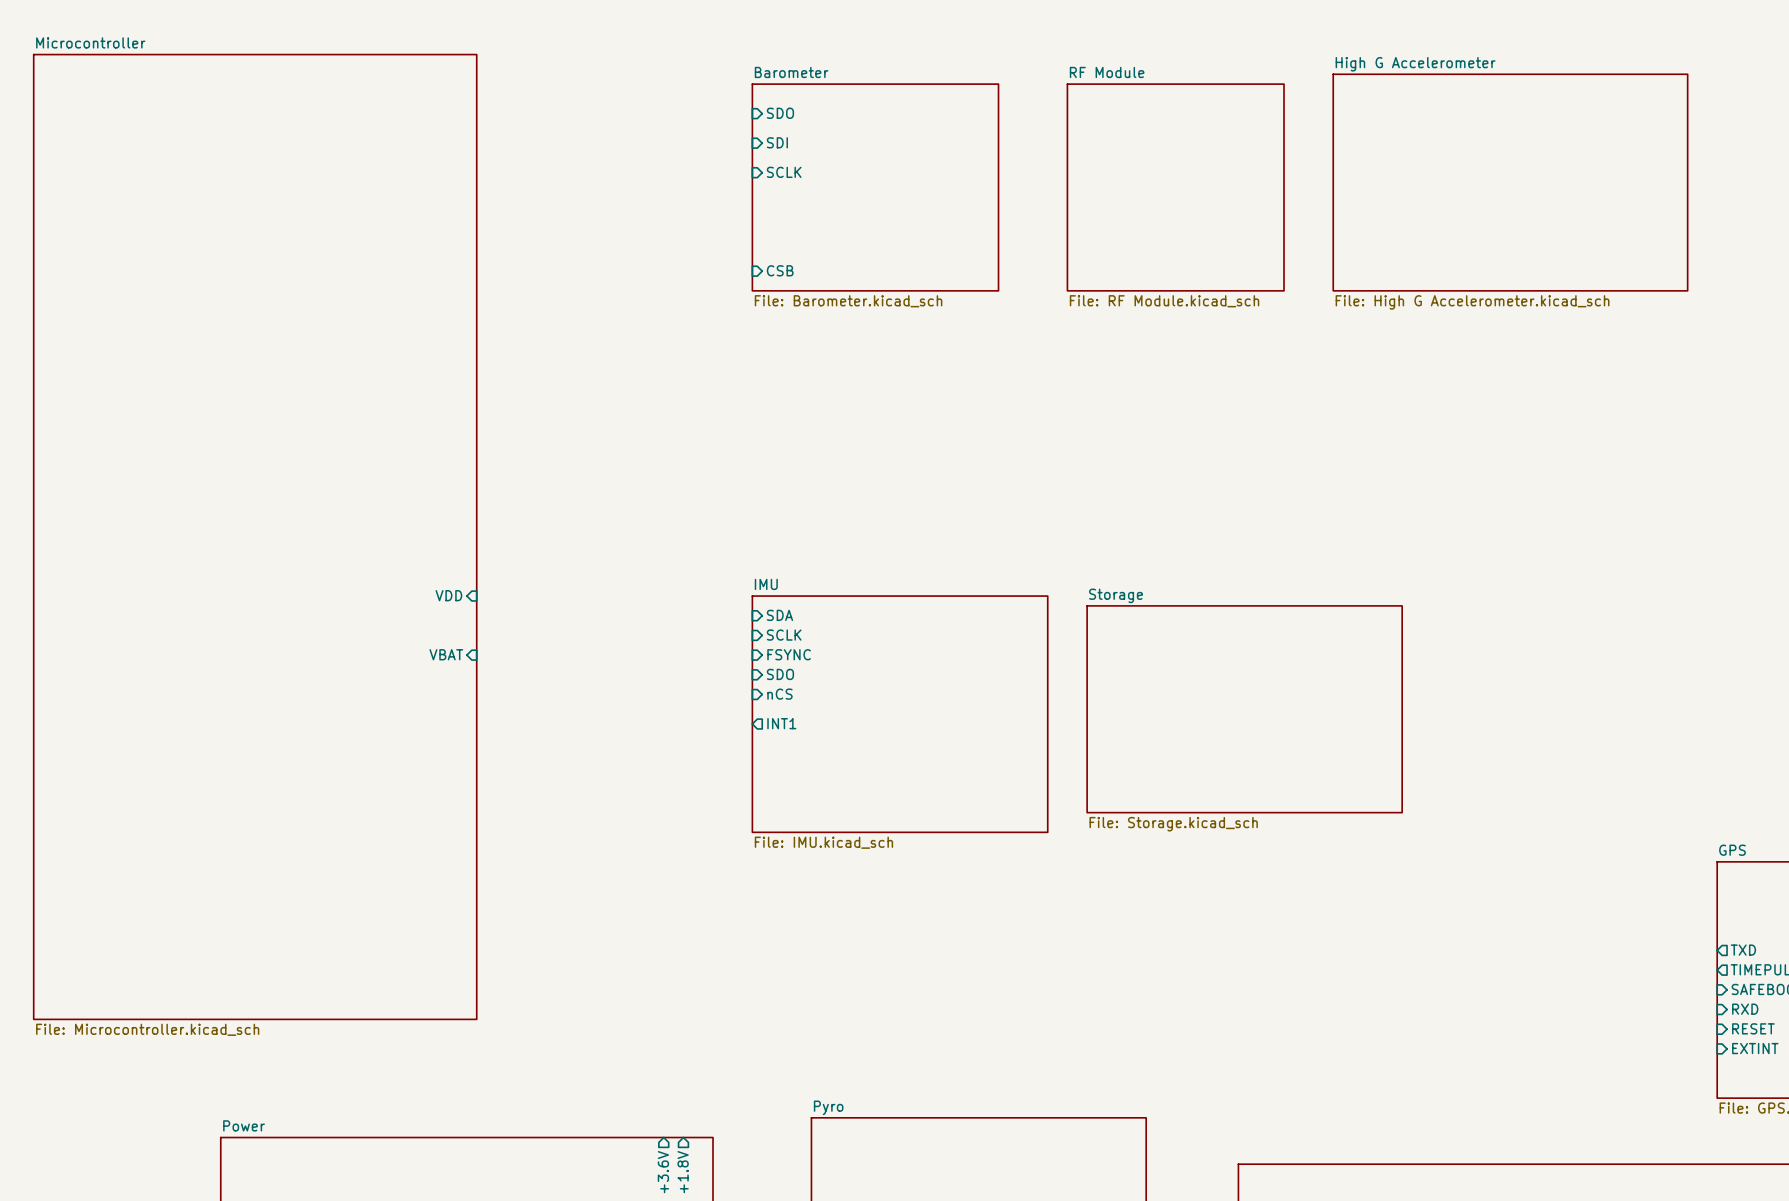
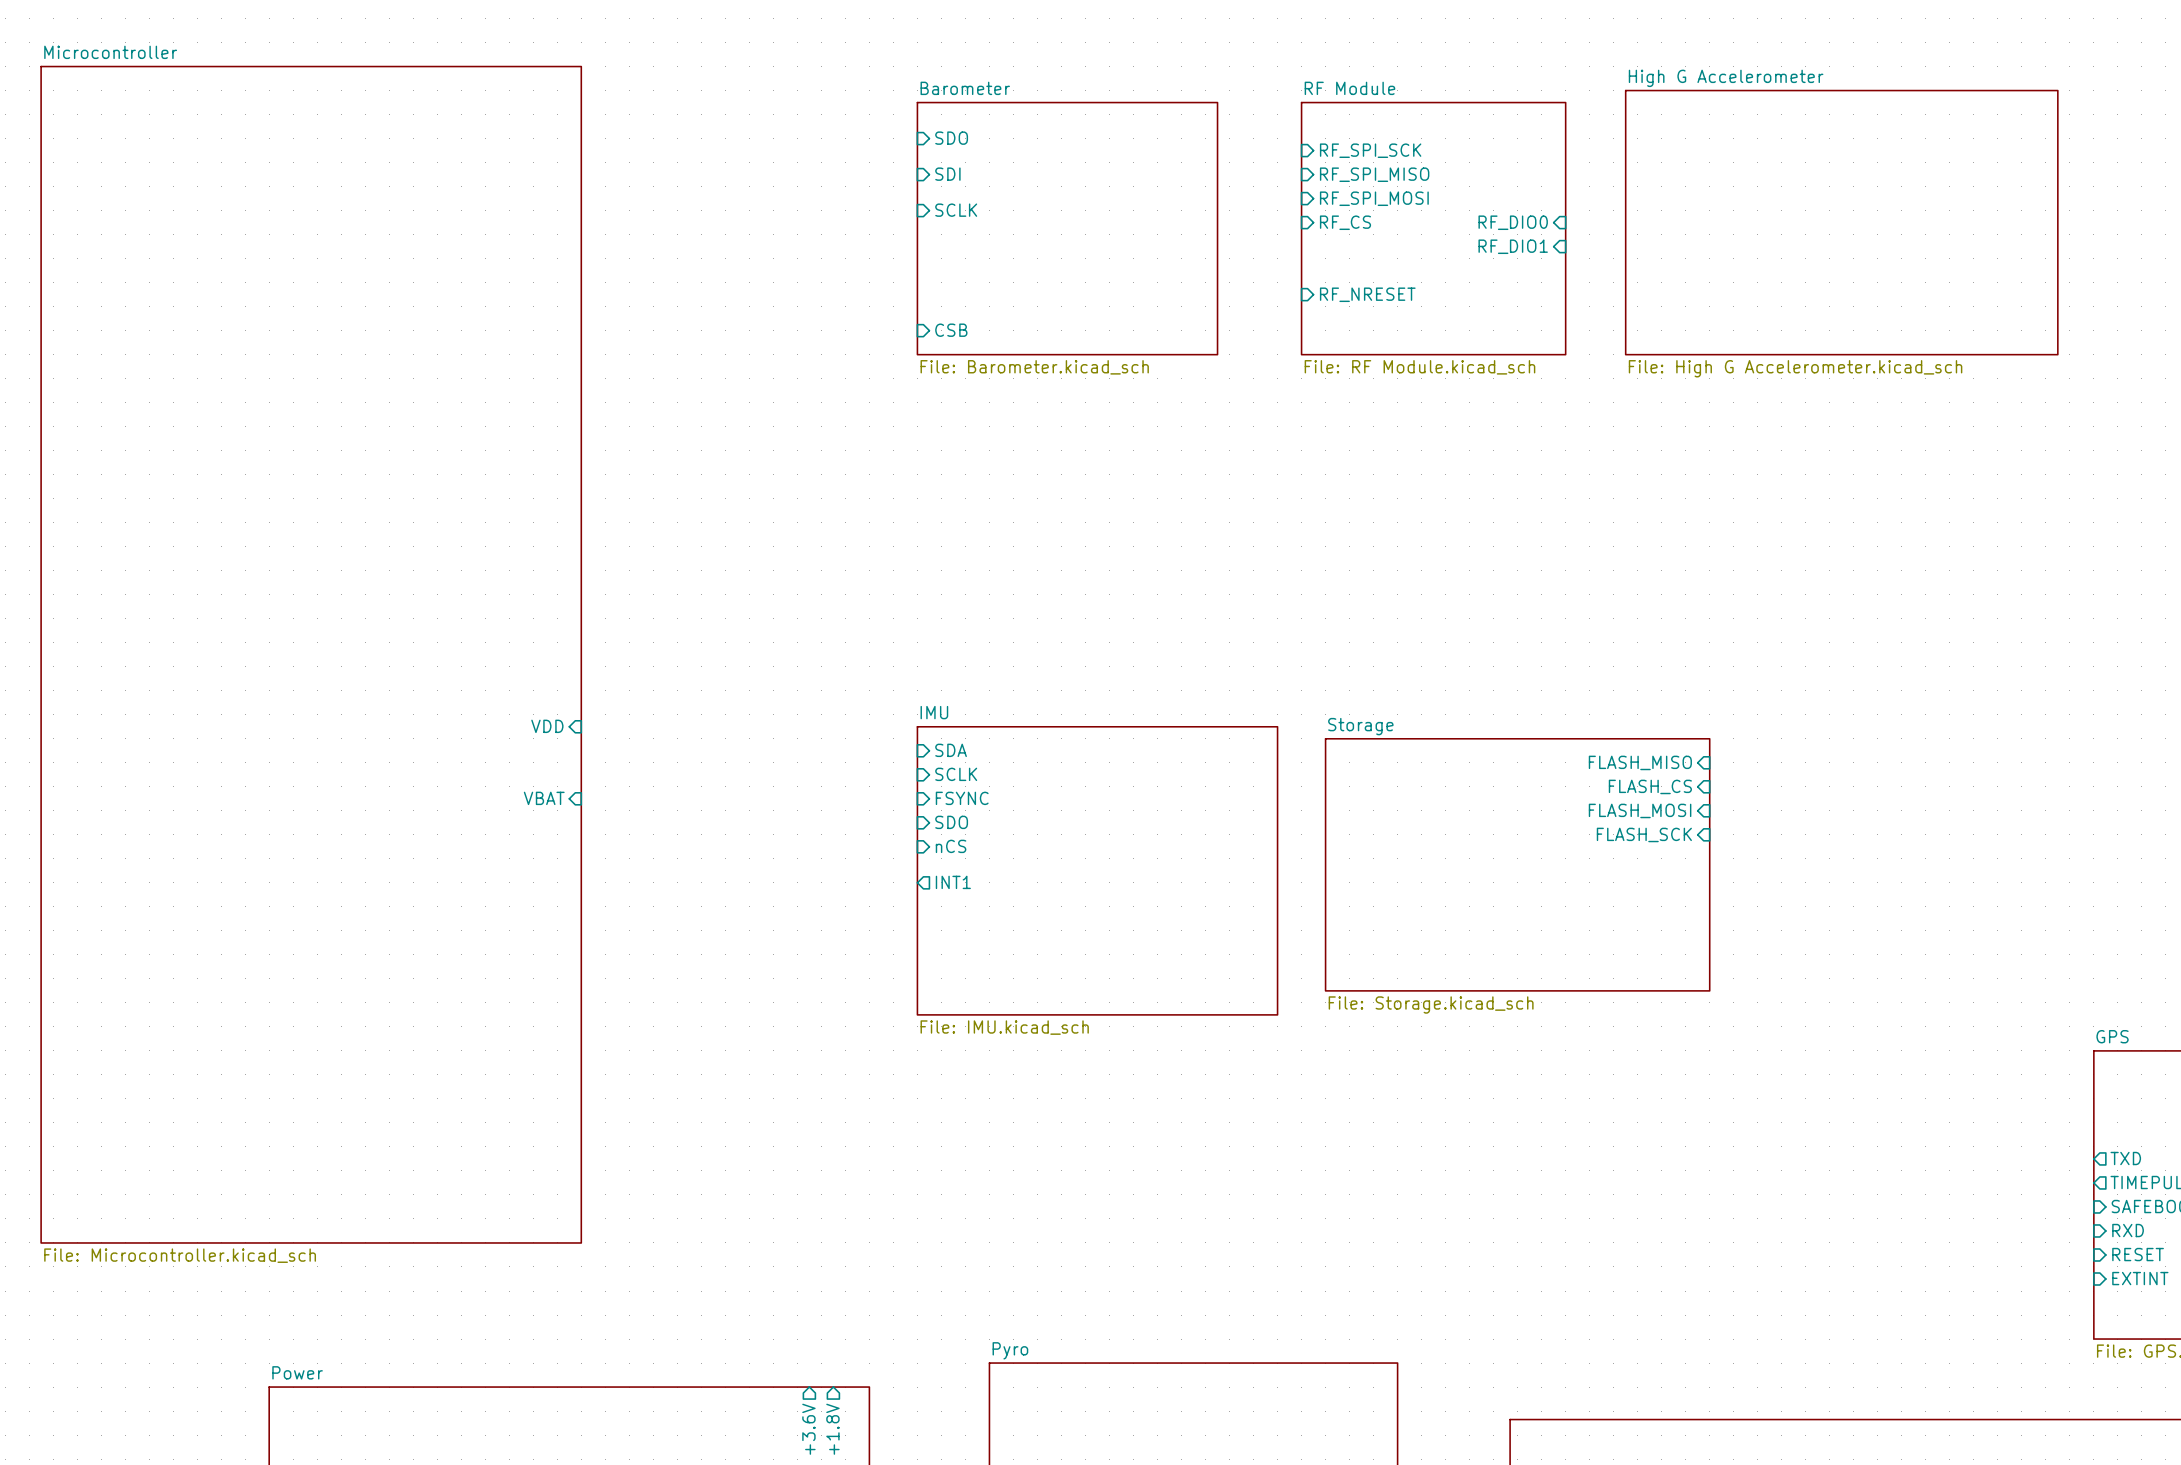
sheet pin: none -> RF_SPI_SCK (1370, 150)
sheet pin: none -> RF_SPI_MISO (1374, 174)
sheet pin: none -> RF_SPI_MOSI (1374, 198)
sheet pin: none -> RF_CS (1345, 222)
sheet pin: none -> RF_DIO0 (1513, 222)
sheet pin: none -> RF_DIO1 (1513, 246)
sheet pin: none -> RF_NRESET (1367, 294)
sheet pin: none -> FLASH_MISO (1640, 762)
sheet pin: none -> FLASH_CS (1650, 786)
sheet pin: none -> FLASH_MOSI (1640, 810)
sheet pin: none -> FLASH_SCK (1644, 834)

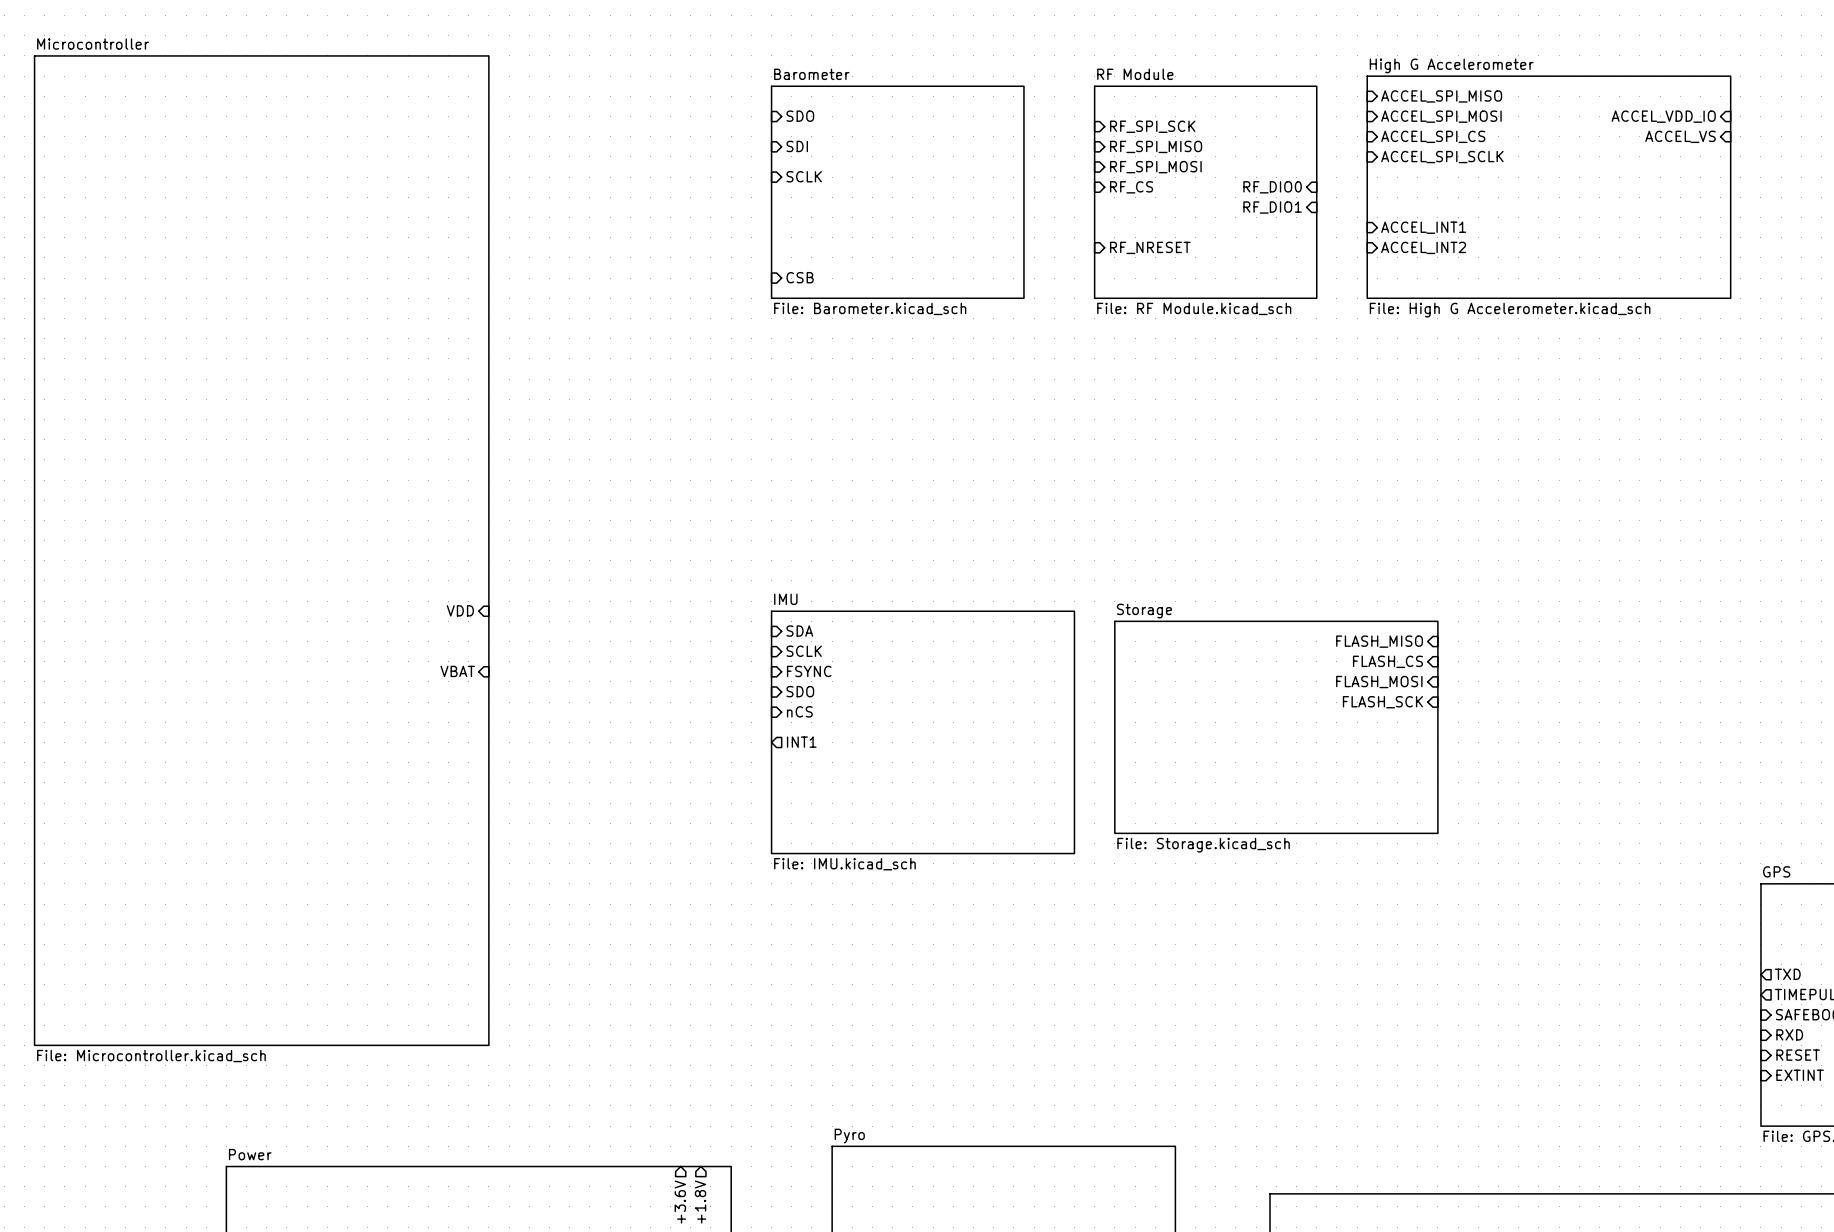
hierarchical label: none -> ACCEL_SPI_MISO (1441, 96)
hierarchical label: none -> ACCEL_SPI_MOSI (1441, 116)
hierarchical label: none -> ACCEL_VDD_IO (1663, 116)
hierarchical label: none -> ACCEL_SPI_CS (1433, 136)
hierarchical label: none -> ACCEL_VS (1680, 136)
hierarchical label: none -> ACCEL_SPI_SCLK (1442, 157)
hierarchical label: none -> ACCEL_INT1 (1423, 227)
hierarchical label: none -> ACCEL_INT2 (1423, 247)

